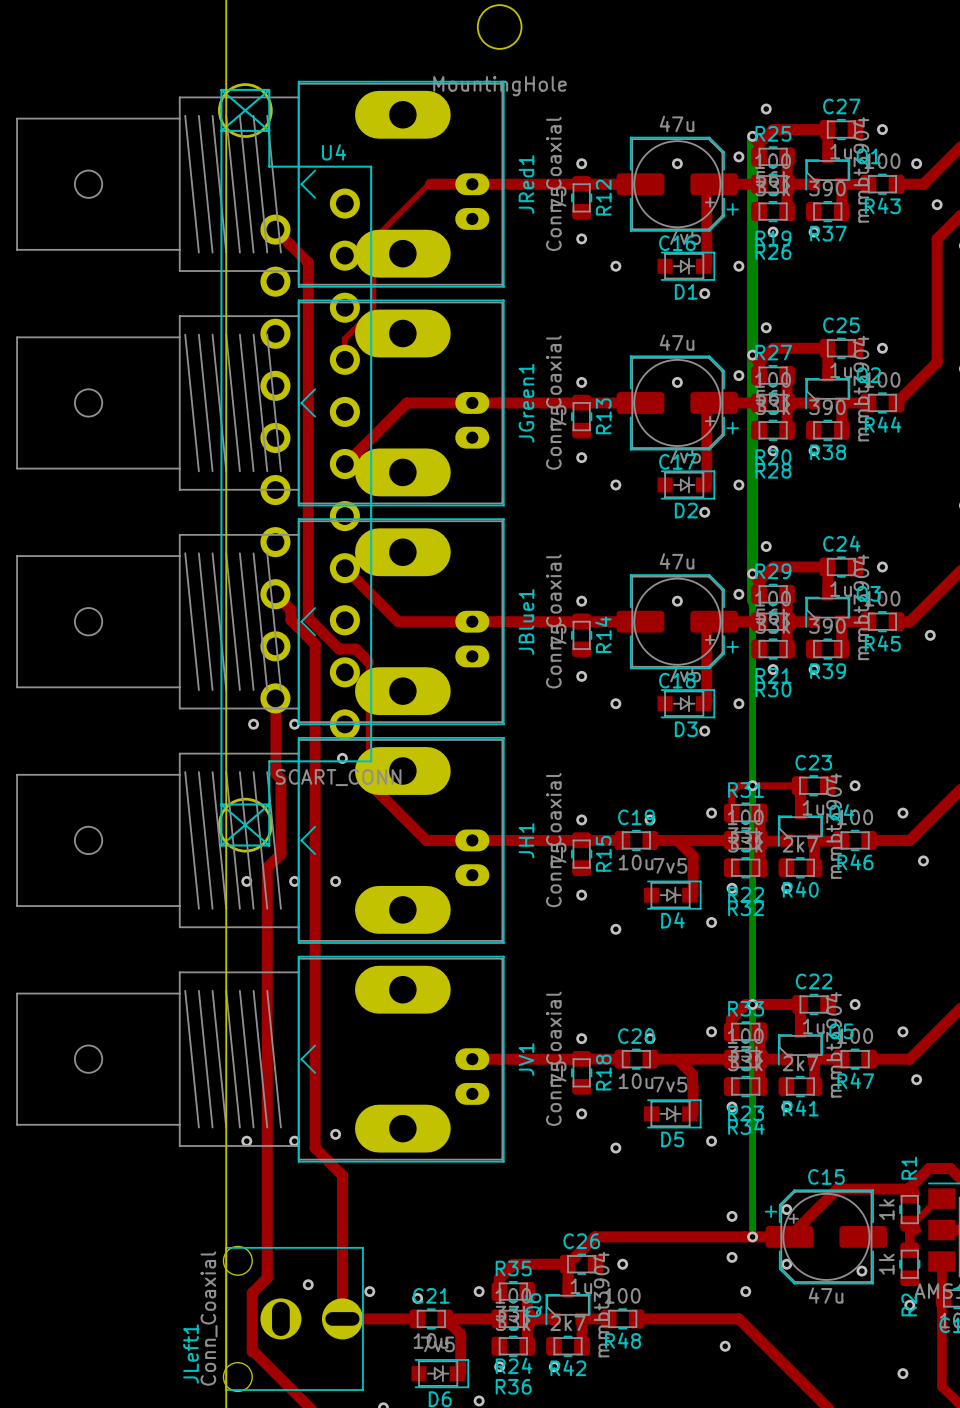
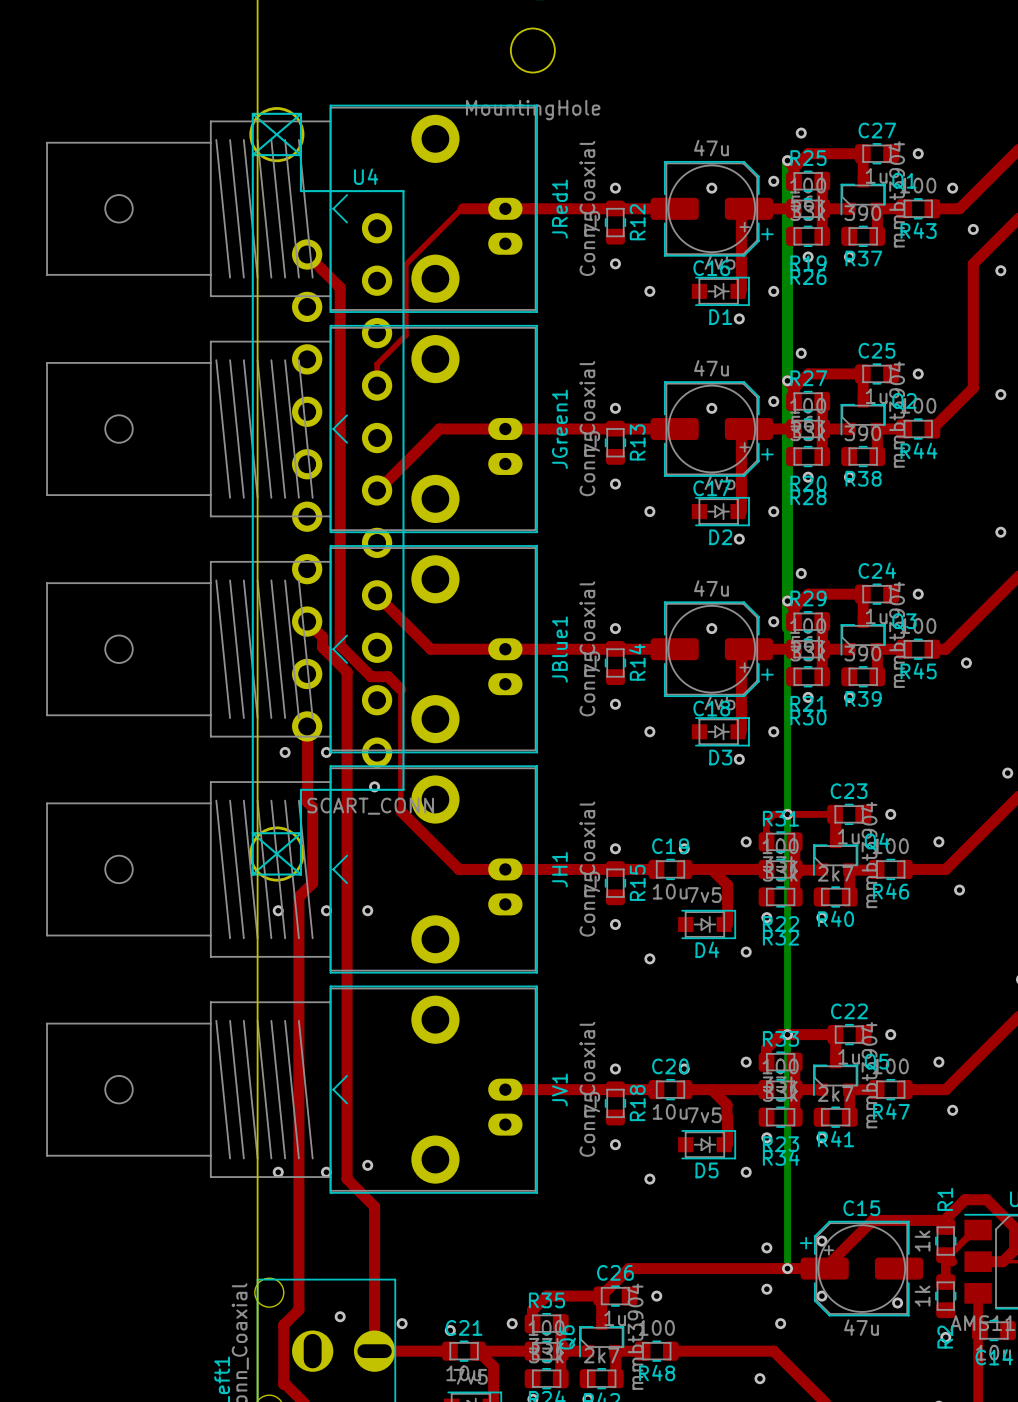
JRed1 footprint: [16, 80, 505, 288] -> [46, 104, 538, 313]
JGreen1 footprint: [16, 299, 505, 507] -> [46, 324, 538, 534]
JBlue1 footprint: [16, 518, 505, 726] -> [46, 545, 538, 754]
JH1 footprint: [16, 737, 505, 944] -> [46, 765, 538, 974]
JV1 footprint: [16, 955, 505, 1163] -> [46, 985, 538, 1194]

